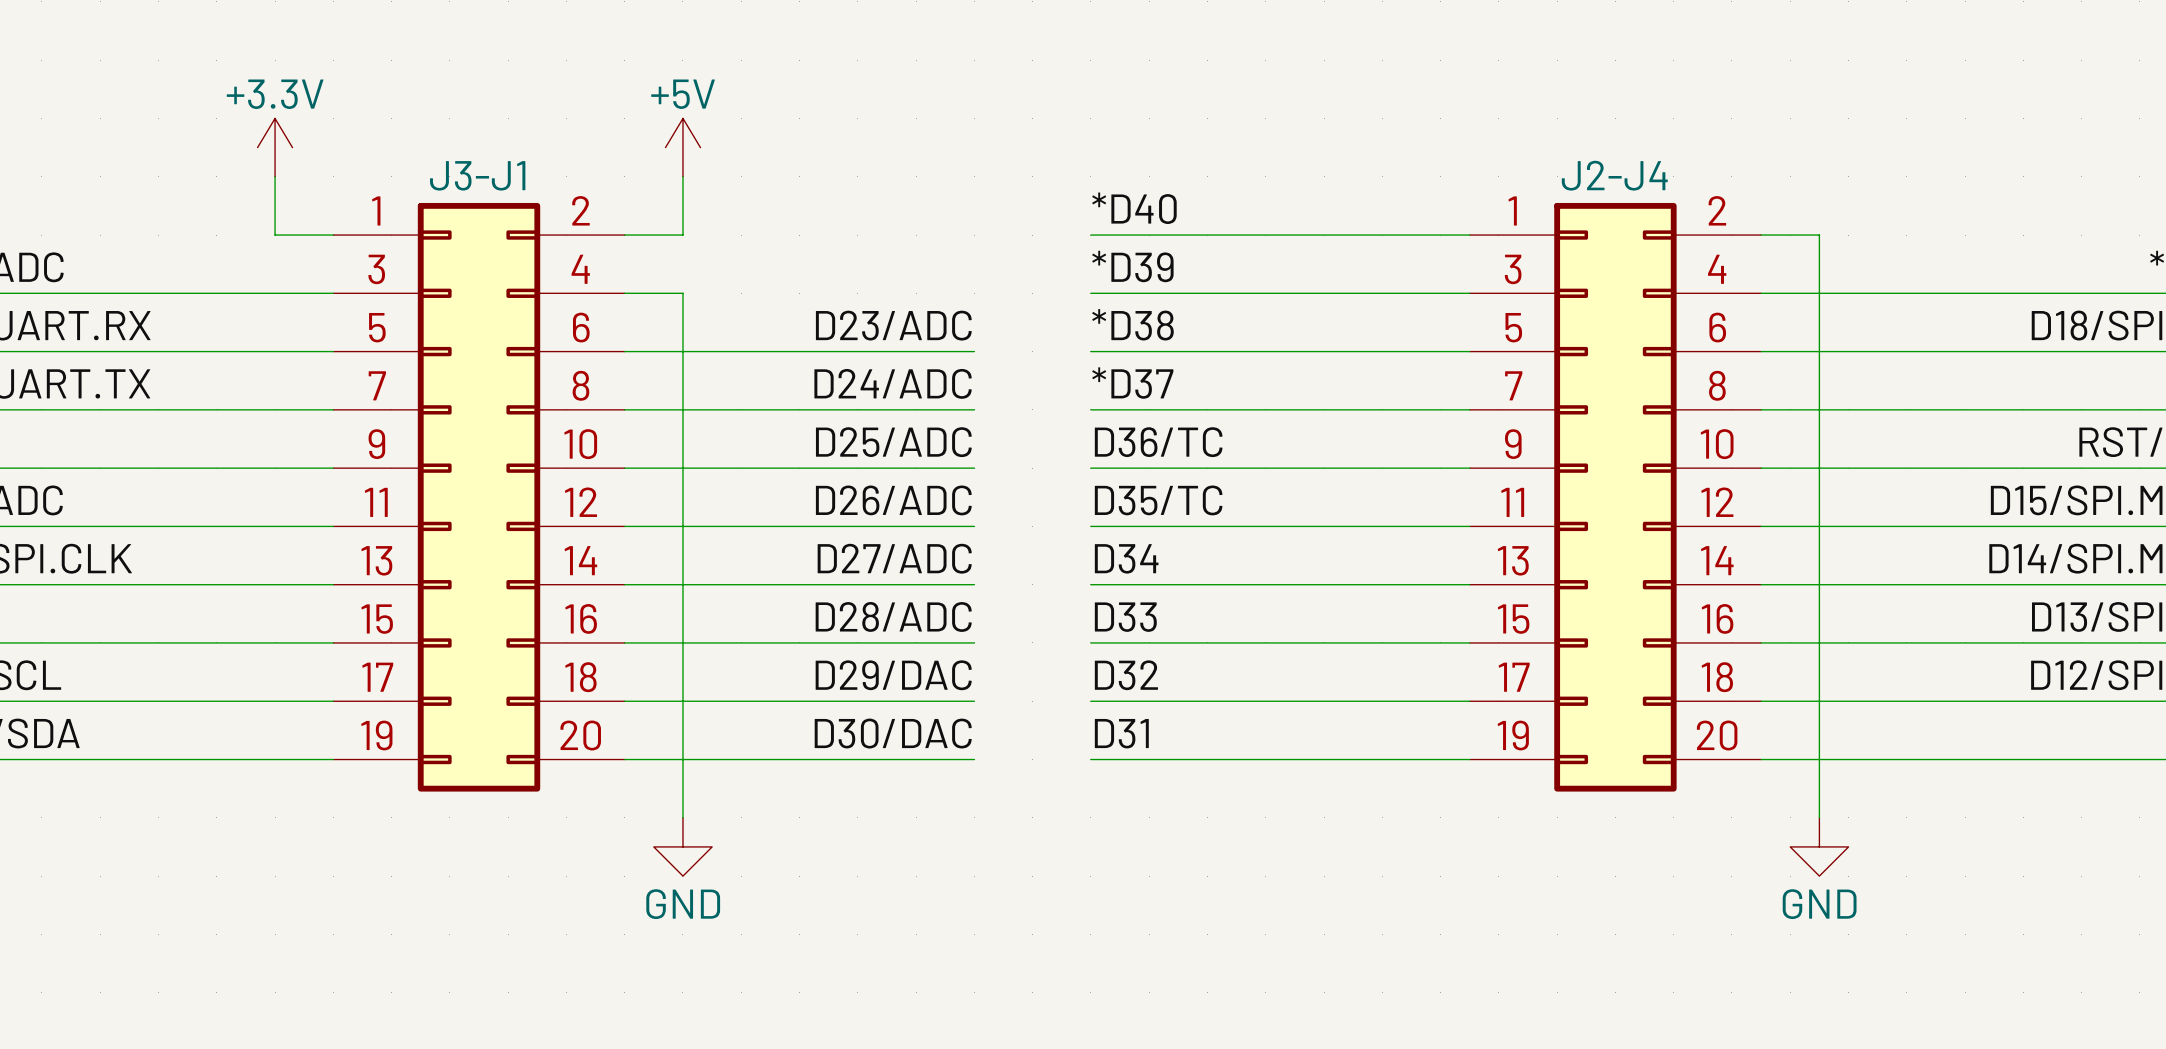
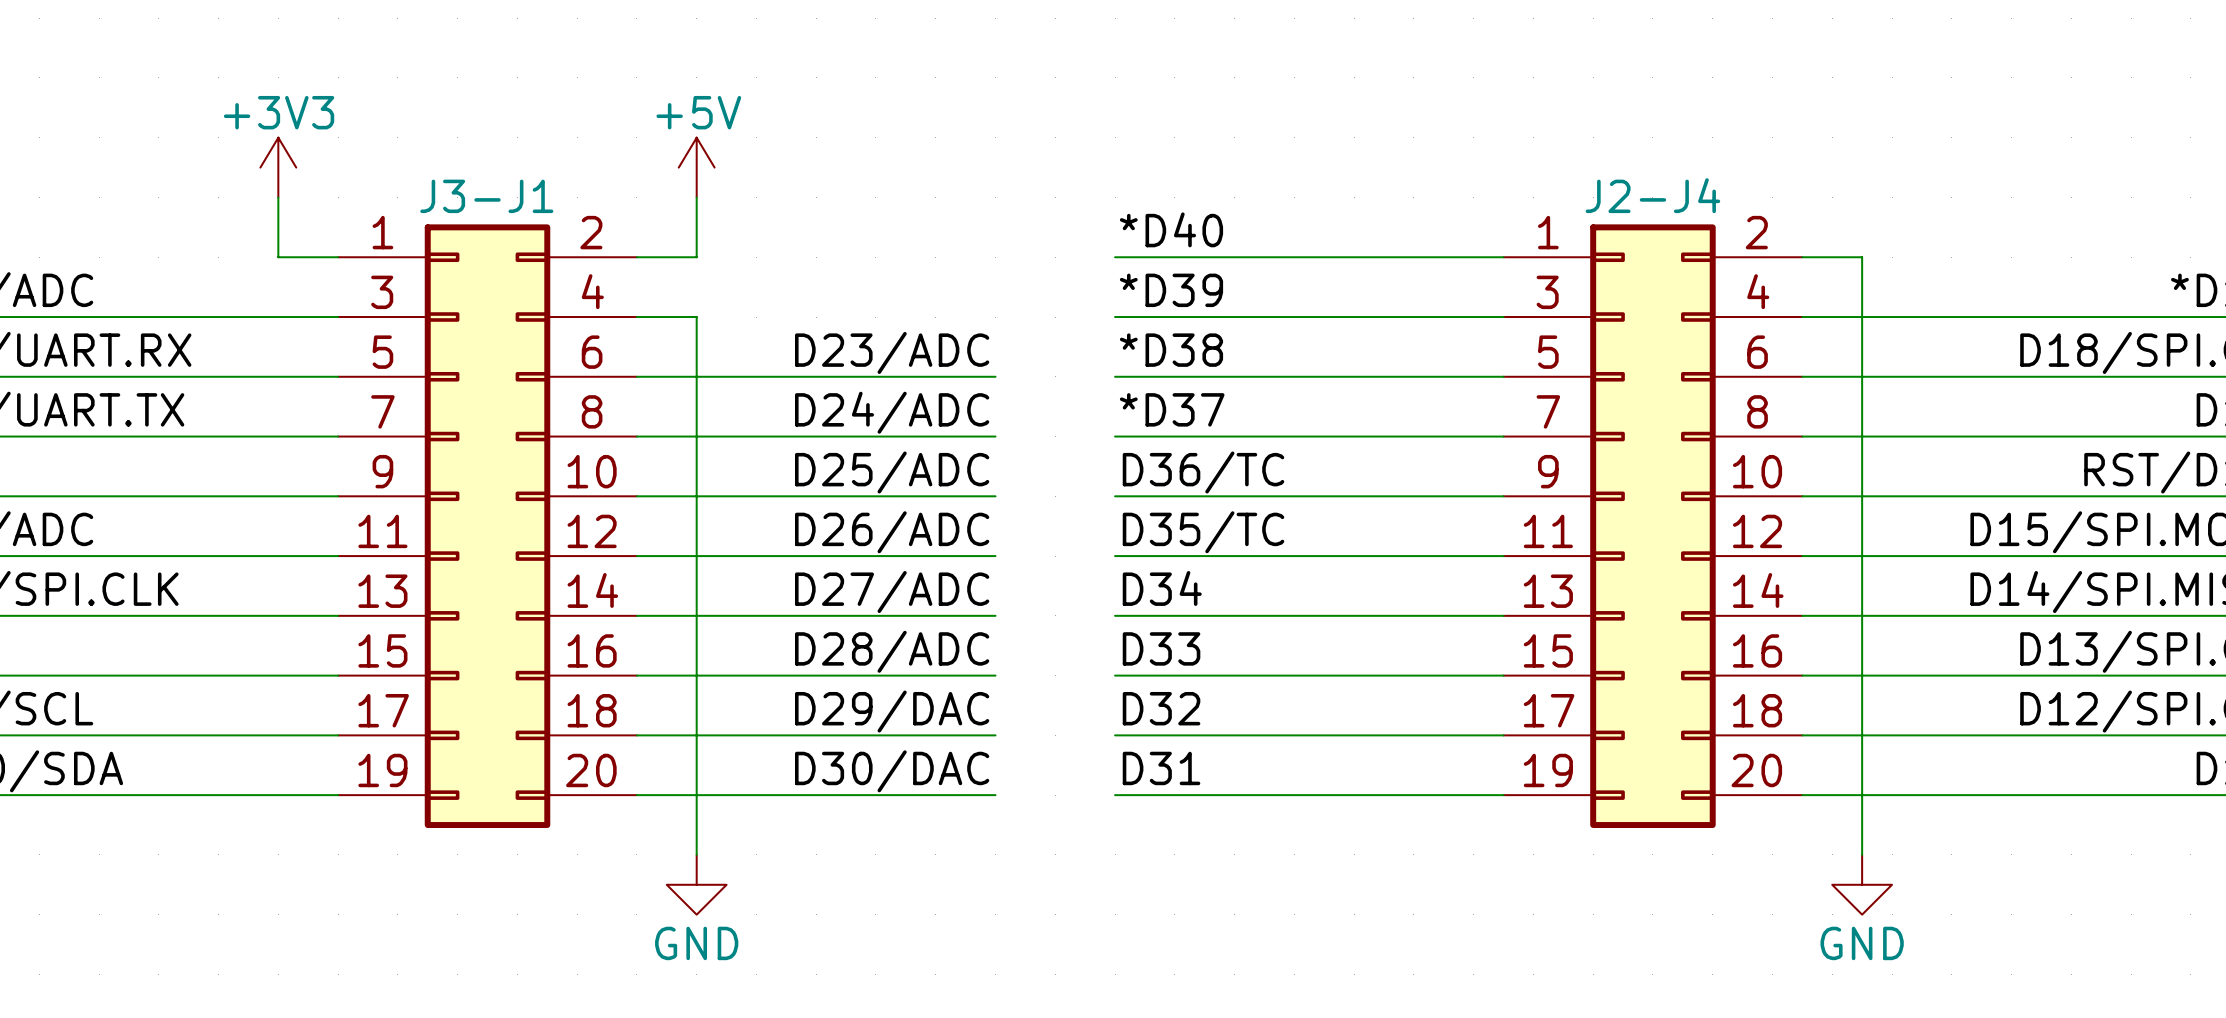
power symbol: +3.3V (275, 147) -> +3V3 (278, 167)

